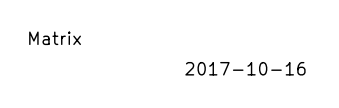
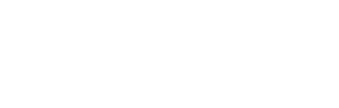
text: Matrix (55, 38) -> none
text: 2017-10-16 (245, 68) -> none

